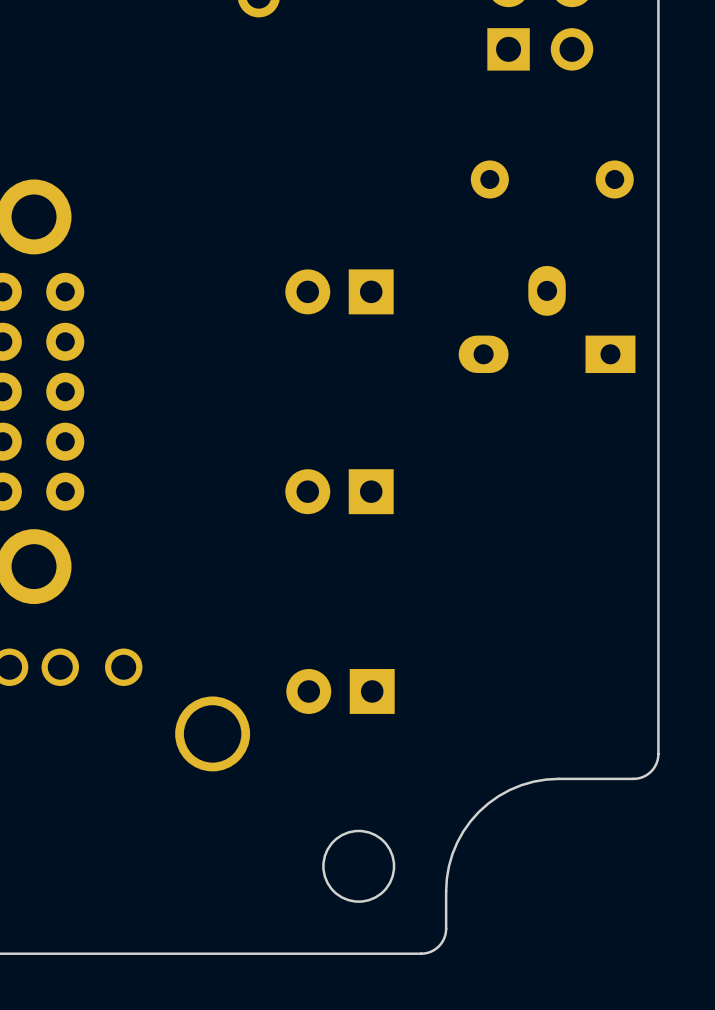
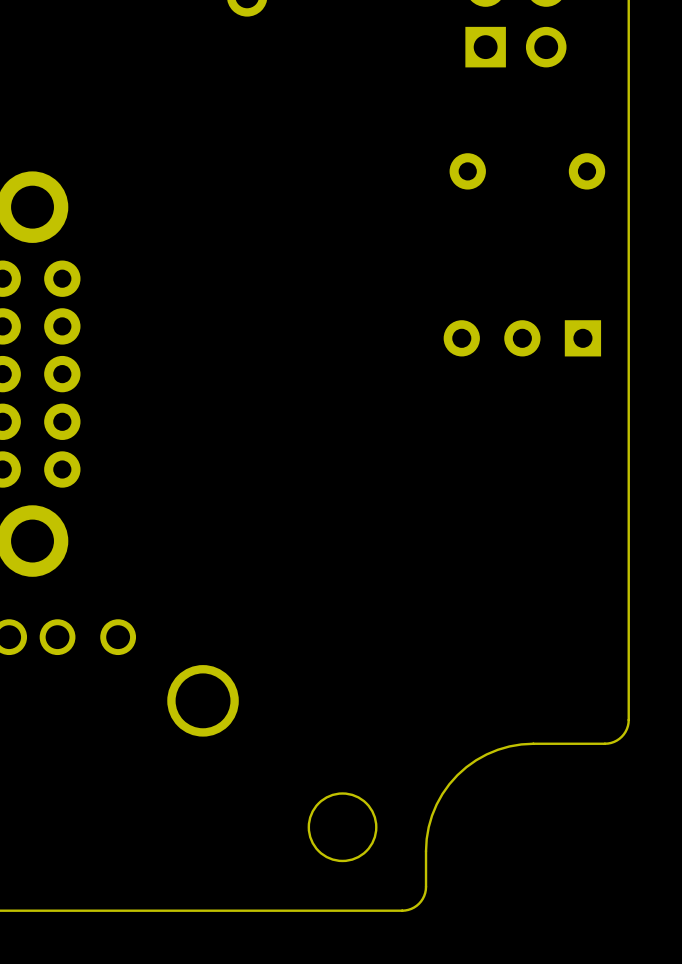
part: (339, 291) -> none
part: (547, 319) -> none
part: none -> (522, 338)
part: (339, 491) -> none
part: (340, 691) -> none

